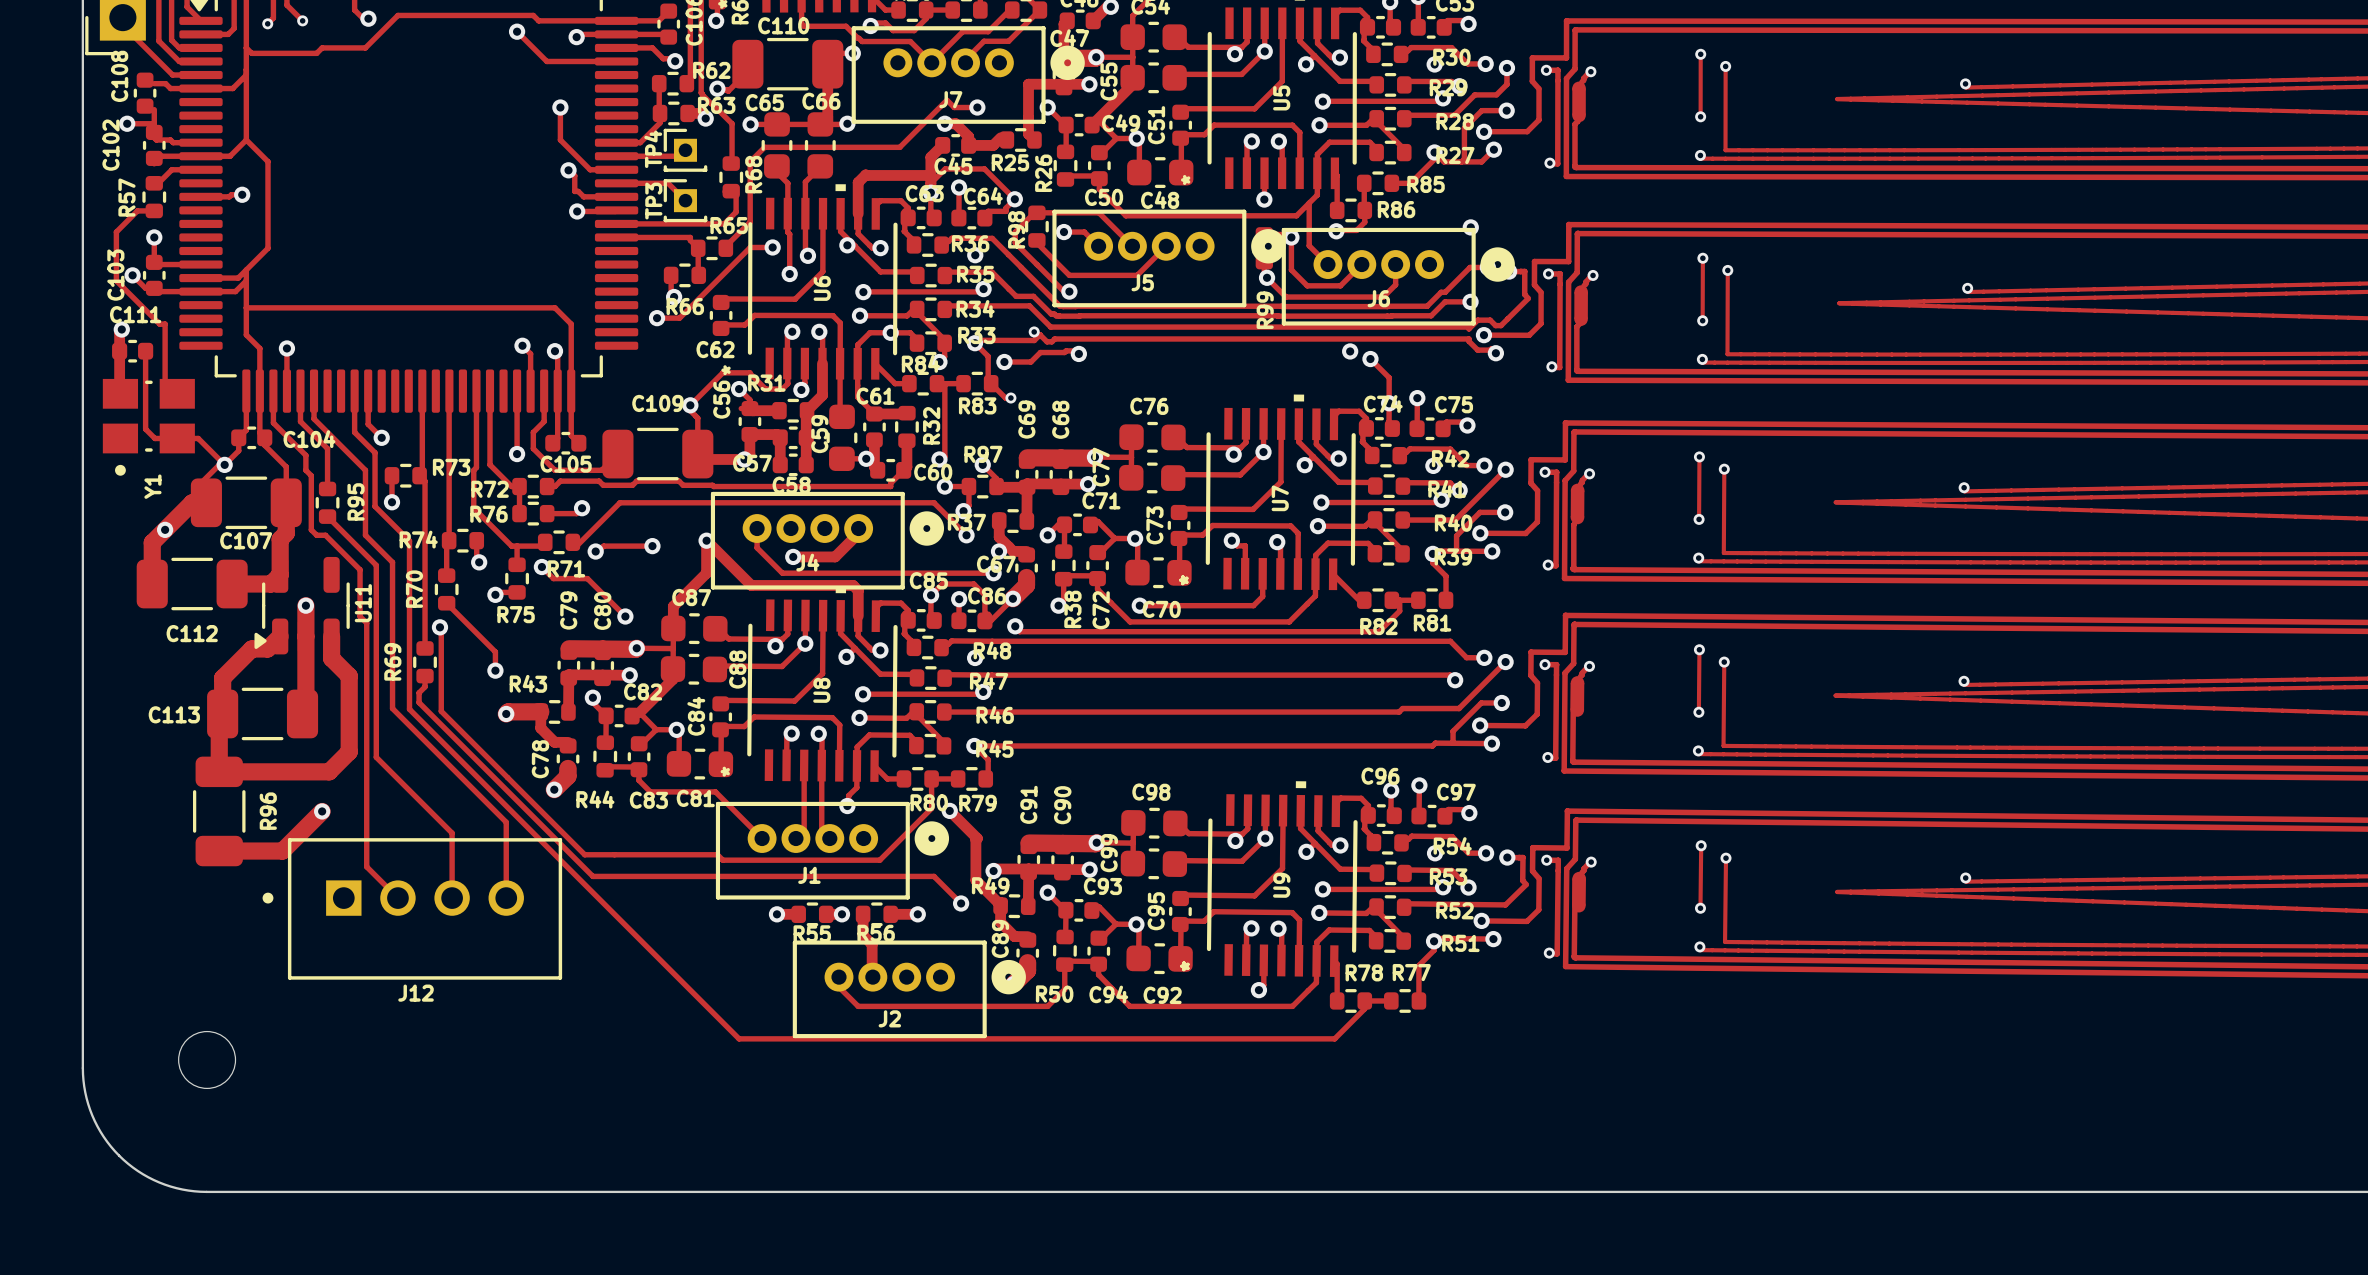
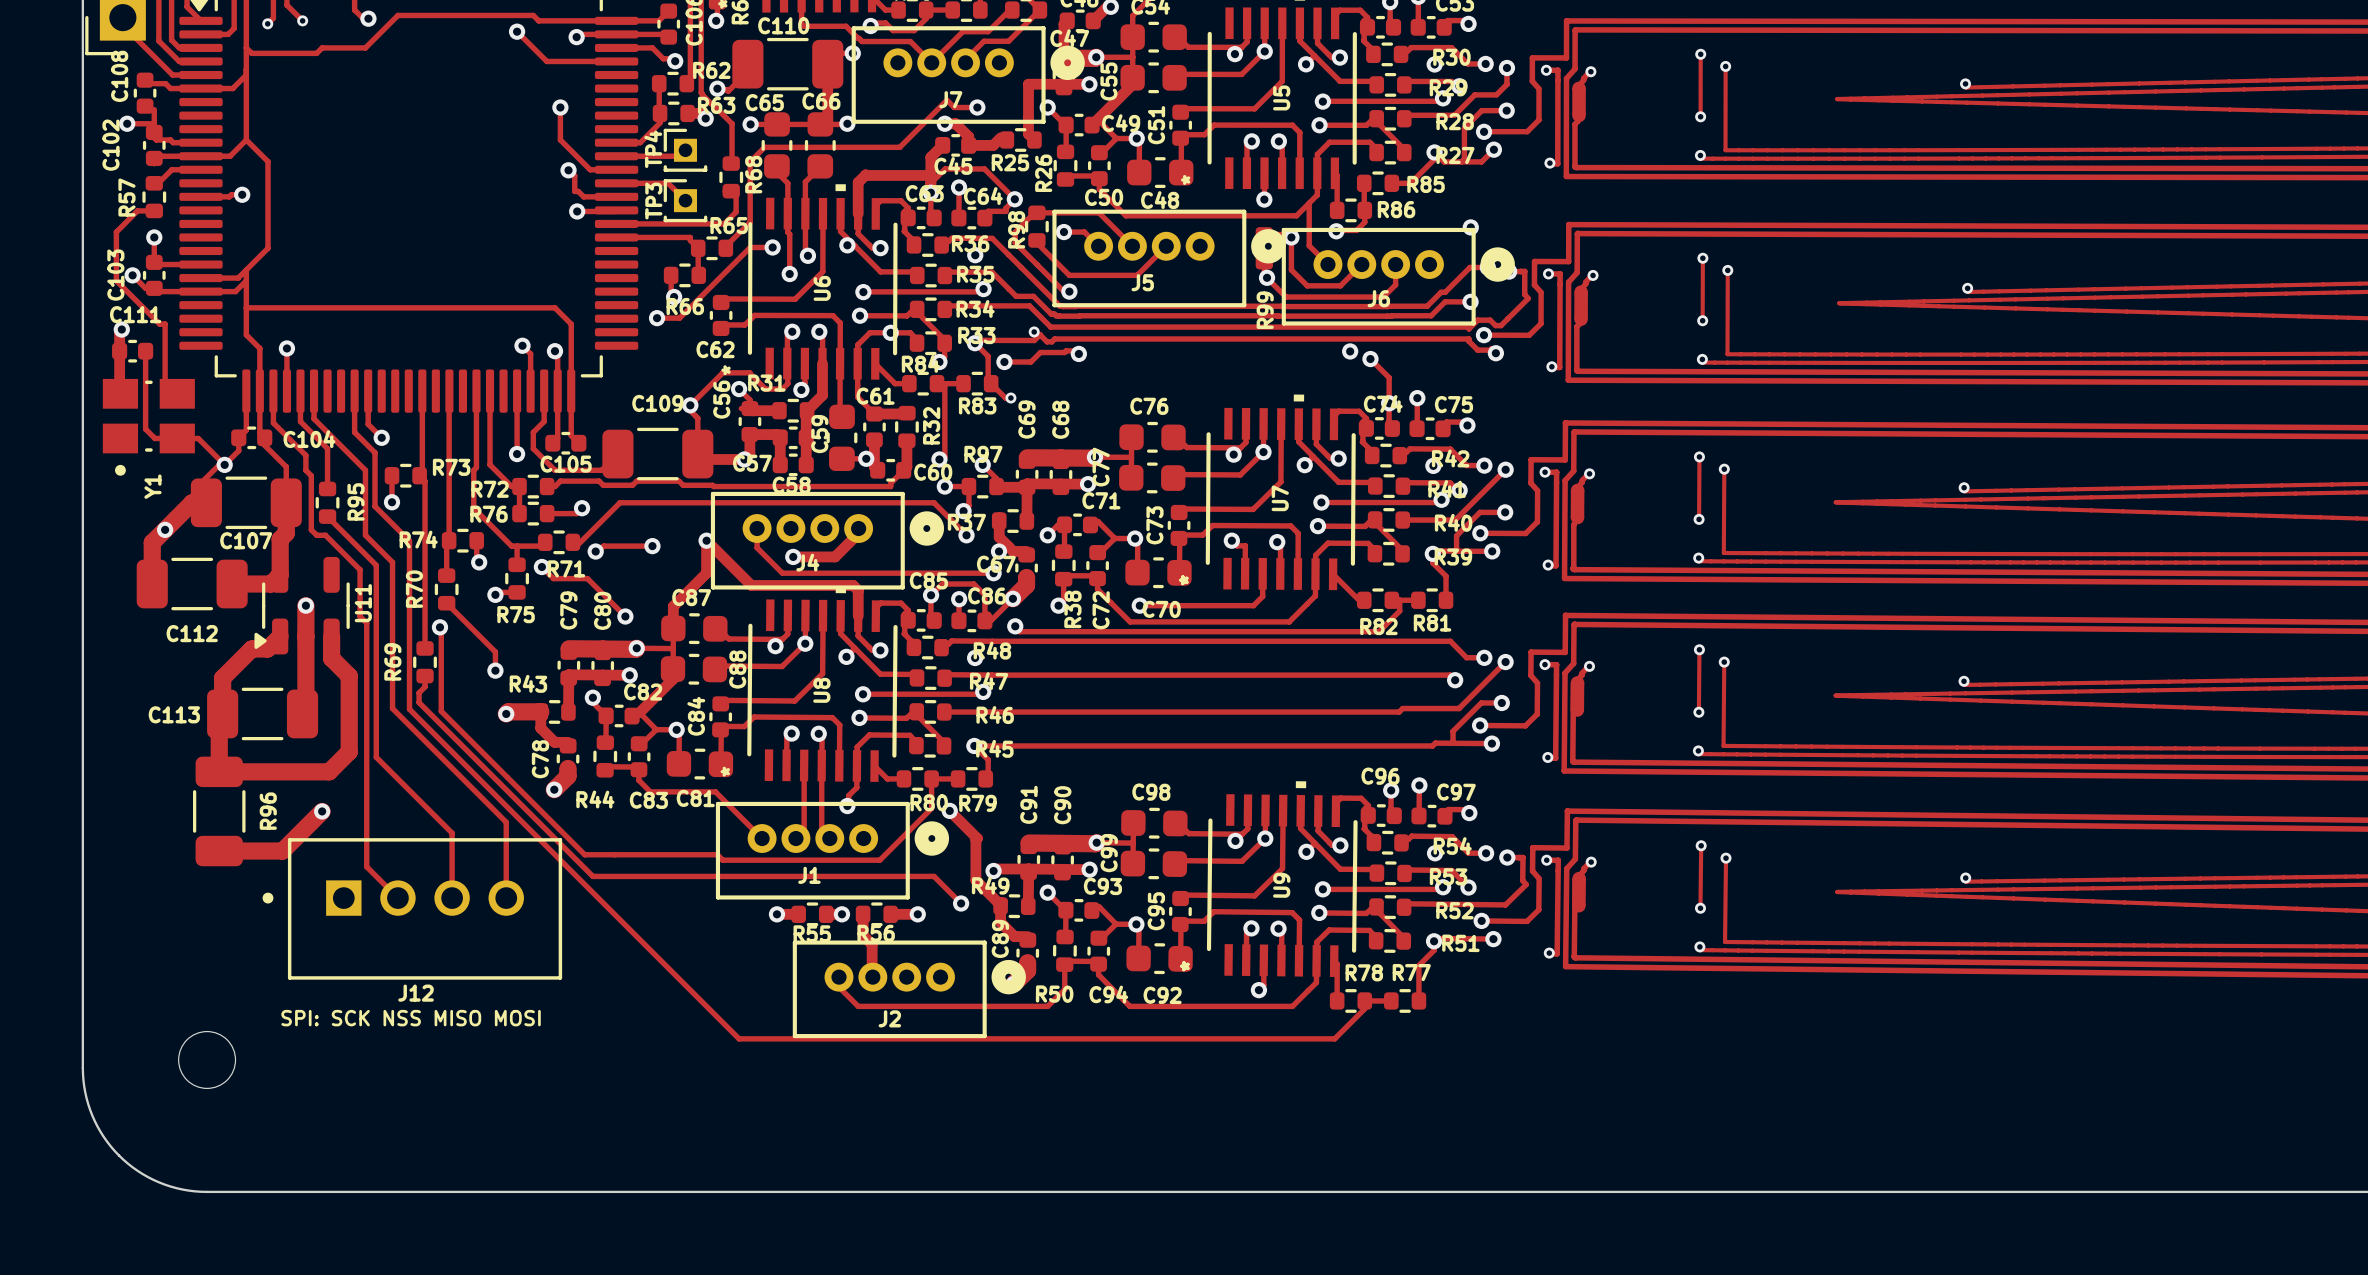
text: none -> SPI: SCK NSS MISO MOSI (411, 1018)

